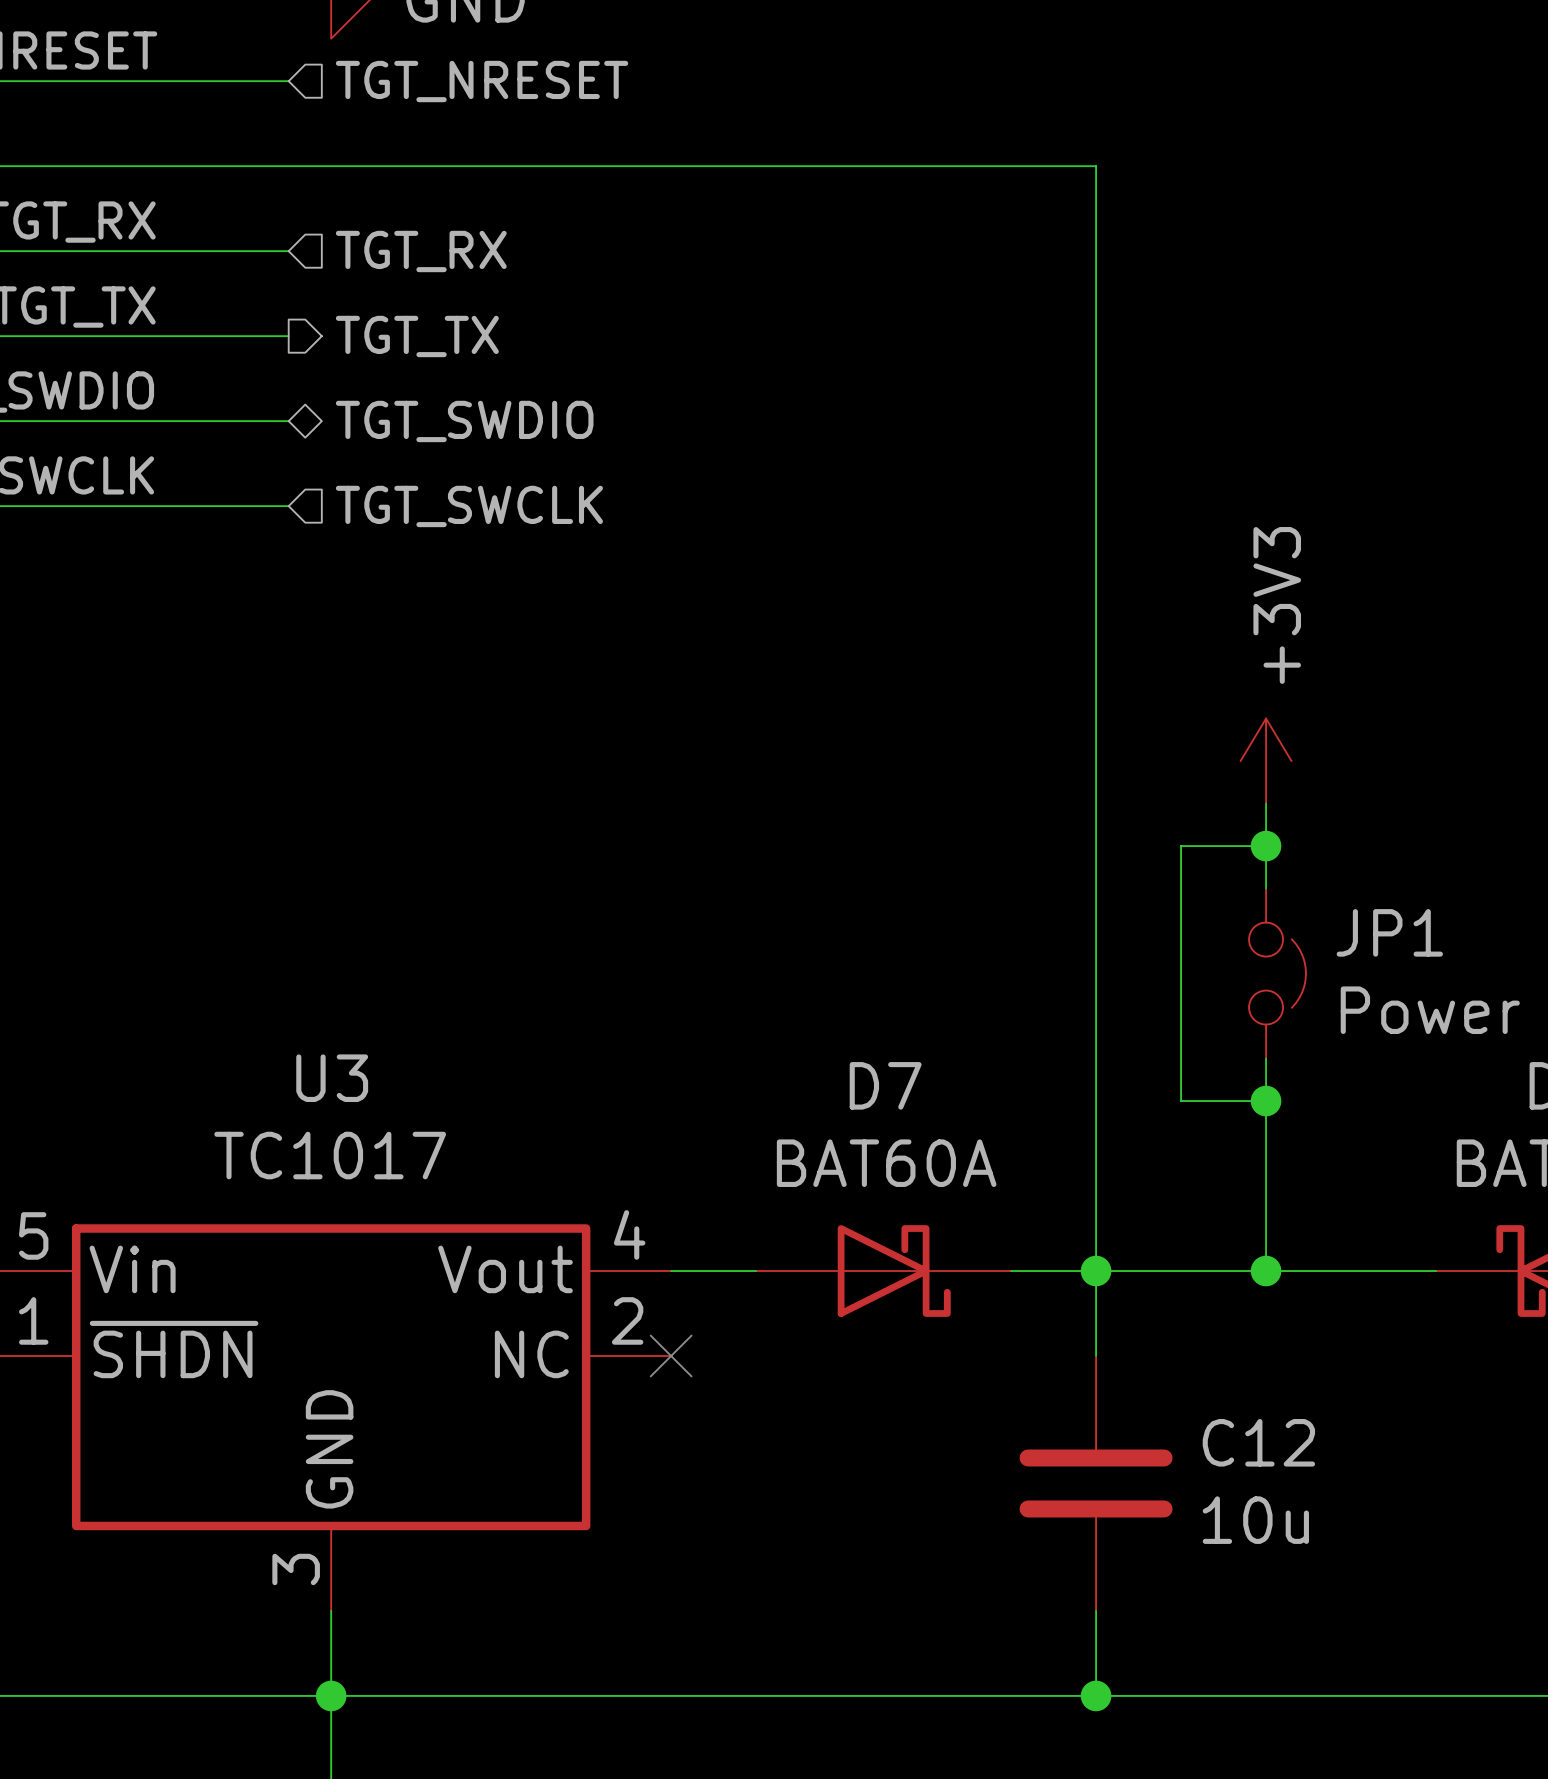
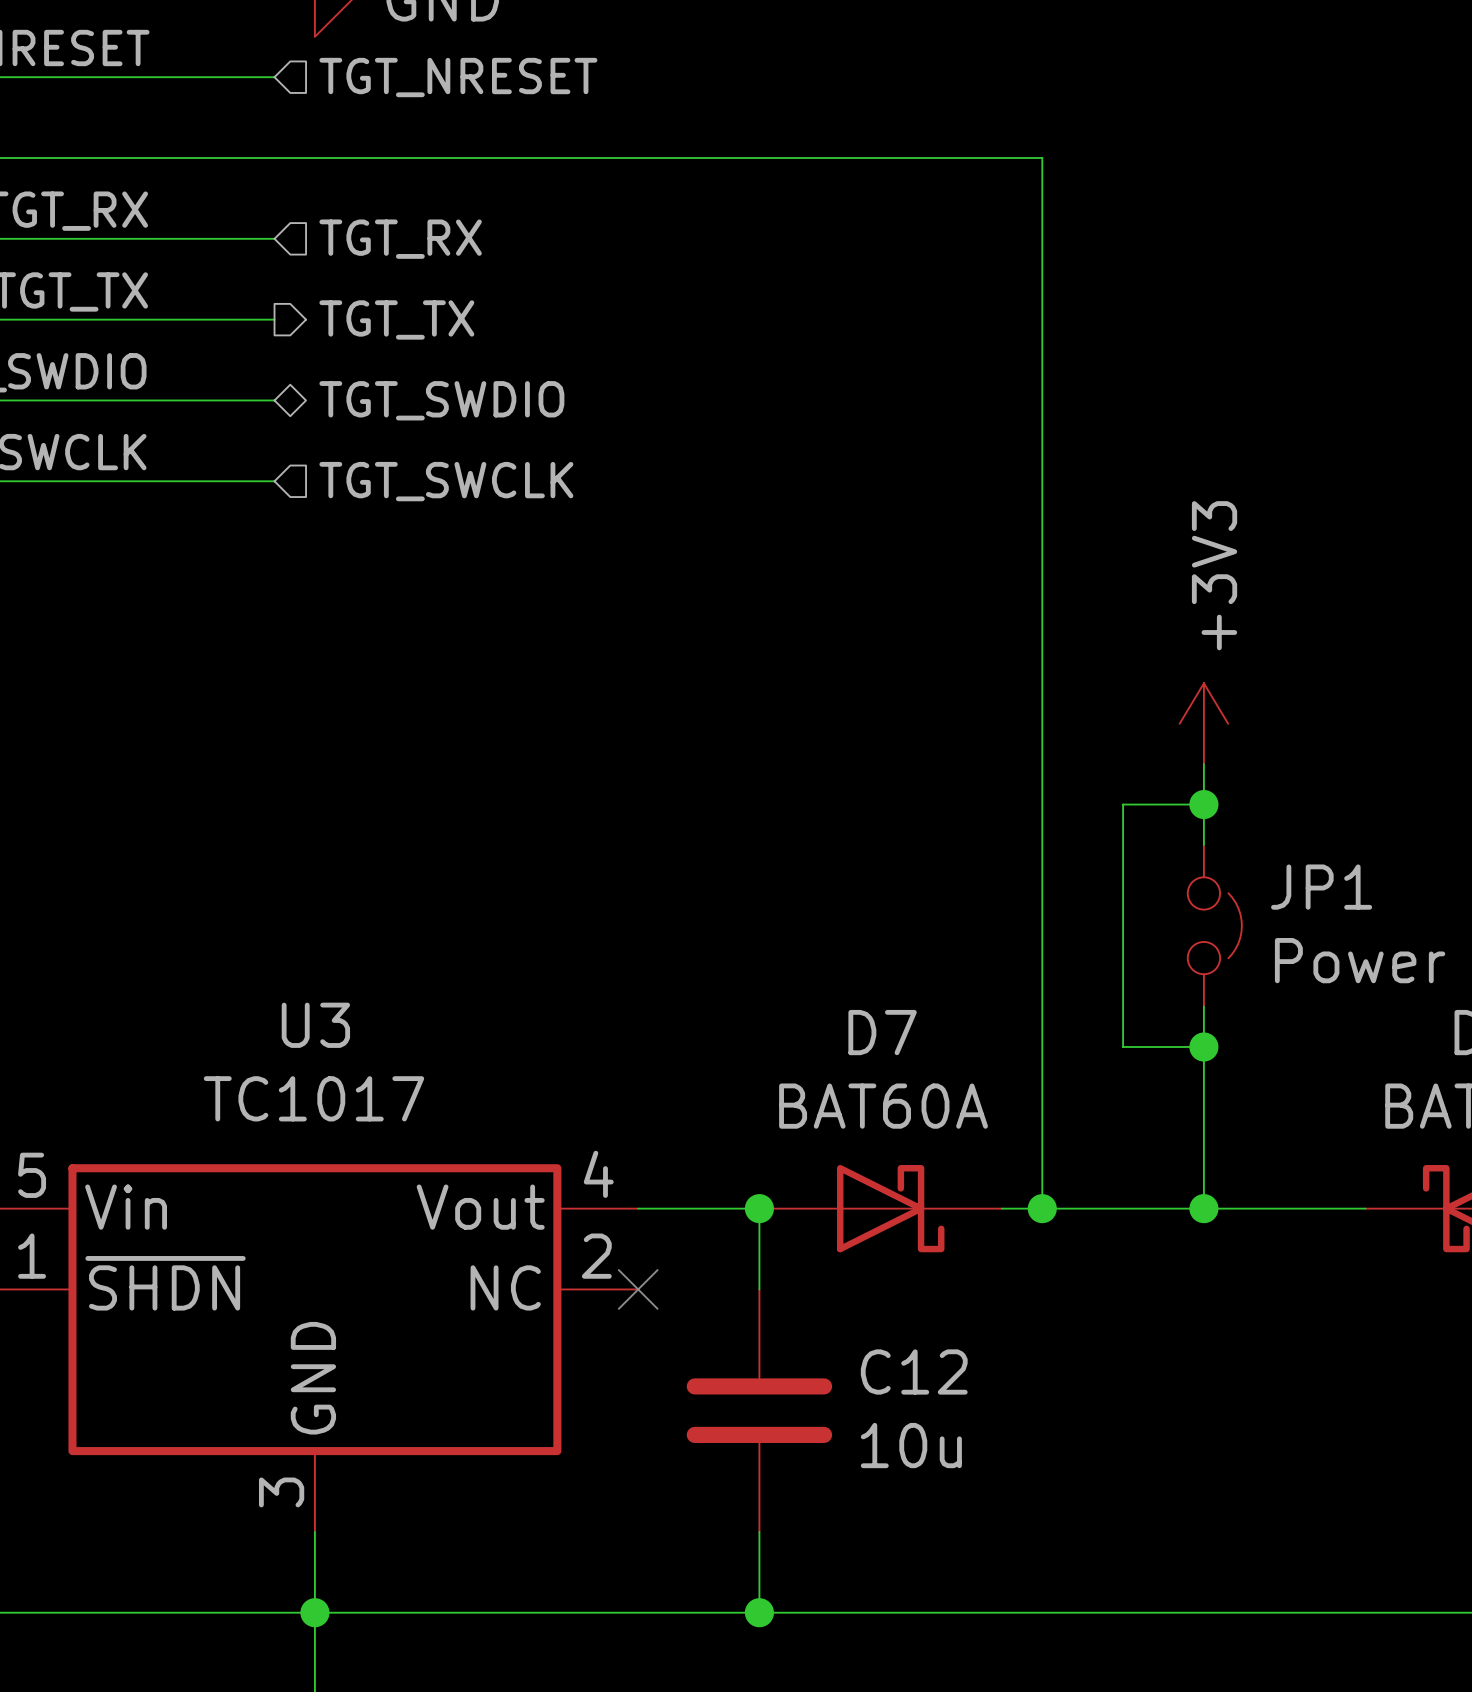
wire: none -> (719, 1208) (759, 1208) (759, 1289)
junction: none -> (759, 1208)
D7 position: (883, 1271) -> (880, 1208)
wire: (1096, 1271) (1096, 1356) -> none
C12 position: (1096, 1483) -> (759, 1410)
wire: (1096, 1610) (1096, 1695) -> (759, 1531) (759, 1612)
junction: none -> (759, 1612)
junction: (1096, 1695) -> none

